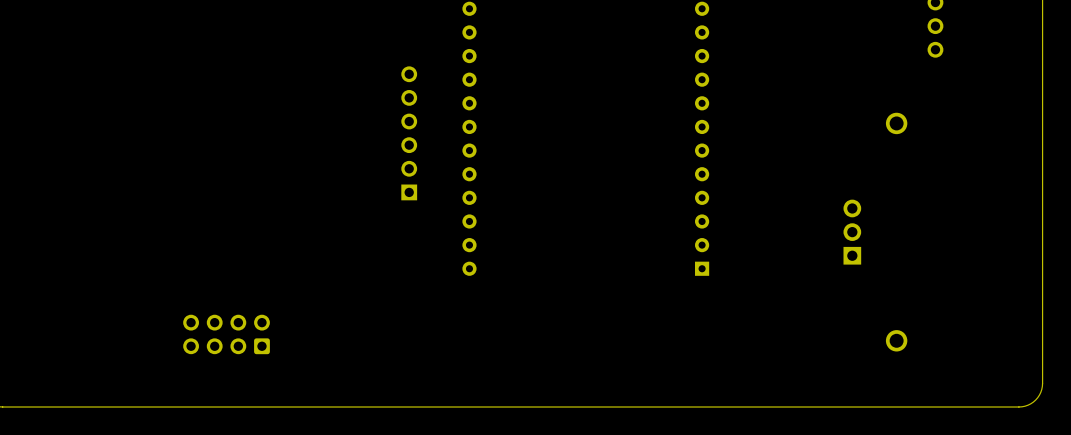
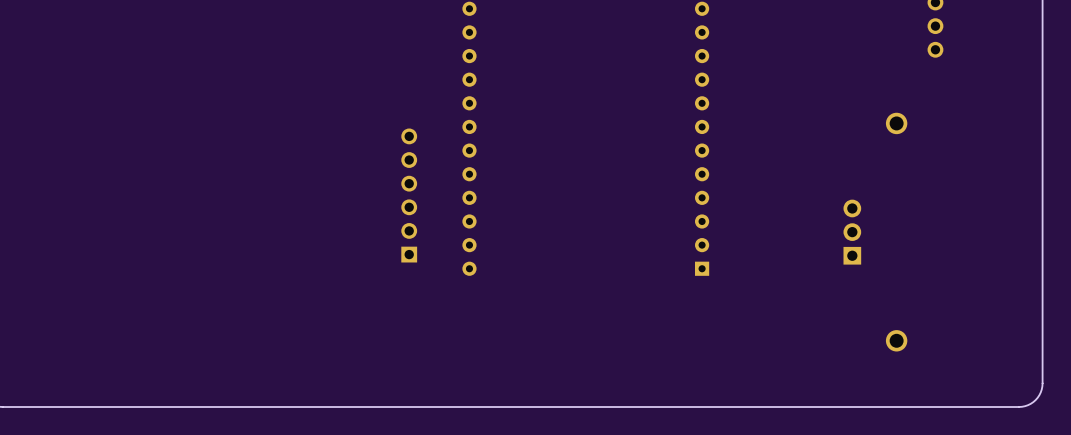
part position: (409, 133) -> (409, 195)
part: (226, 334) -> none

